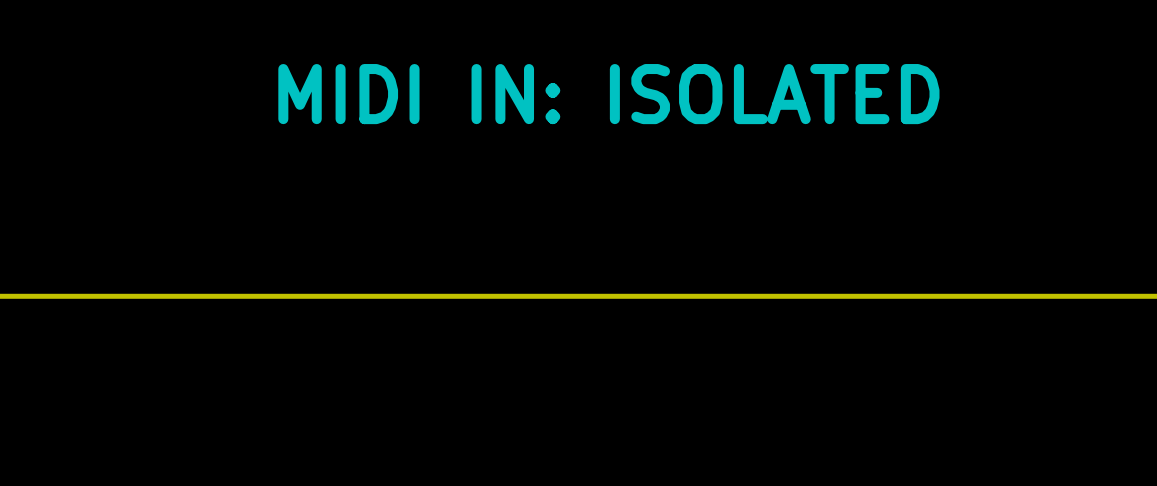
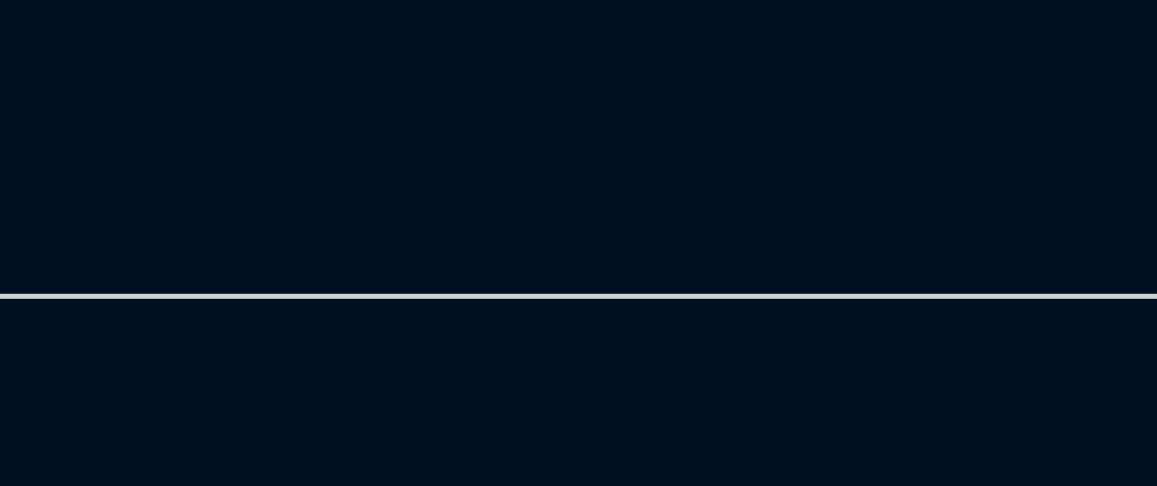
text: MIDI IN: ISOLATED (608, 94) -> none

